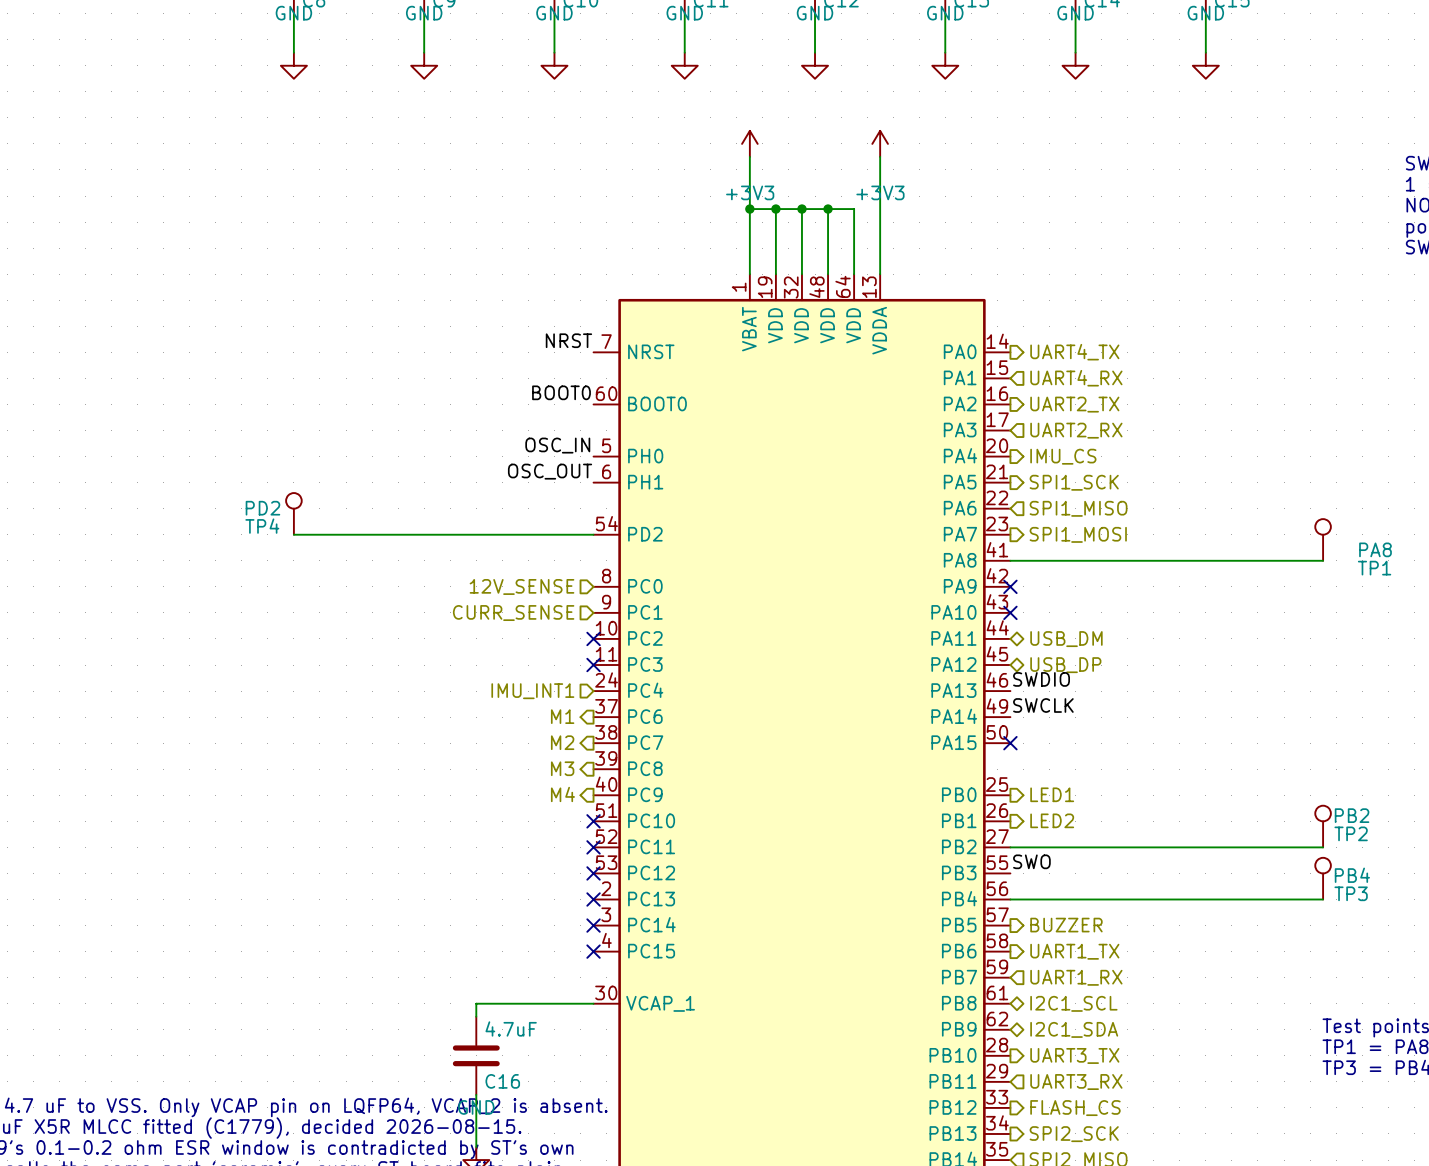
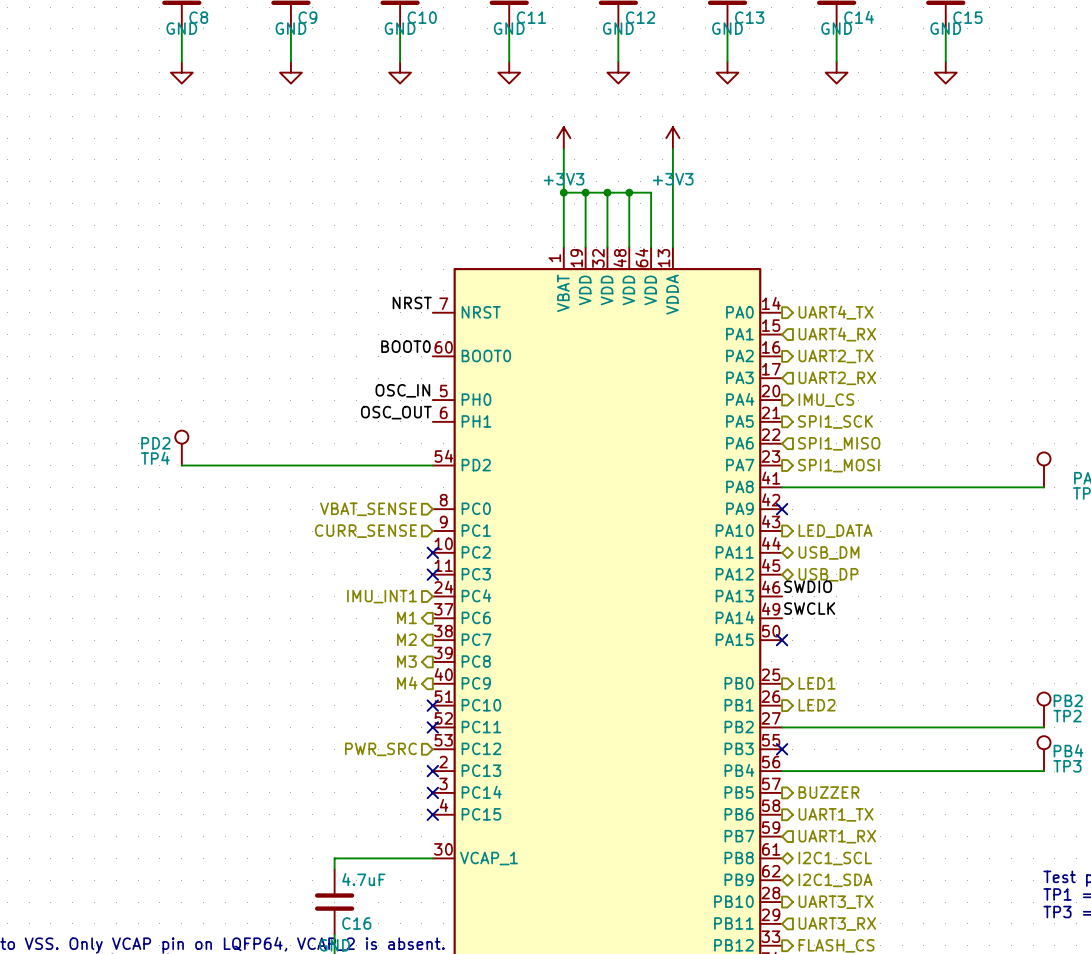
hierarchical label: 12V_SENSE (522, 586) -> VBAT_SENSE (368, 509)
no-connect mark: (1010, 612) -> none
hierarchical label: none -> LED_DATA (835, 531)
label: SWO (1031, 861) -> none
hierarchical label: none -> PWR_SRC (380, 749)
no-connect mark: (593, 873) -> none
no-connect mark: none -> (782, 749)

